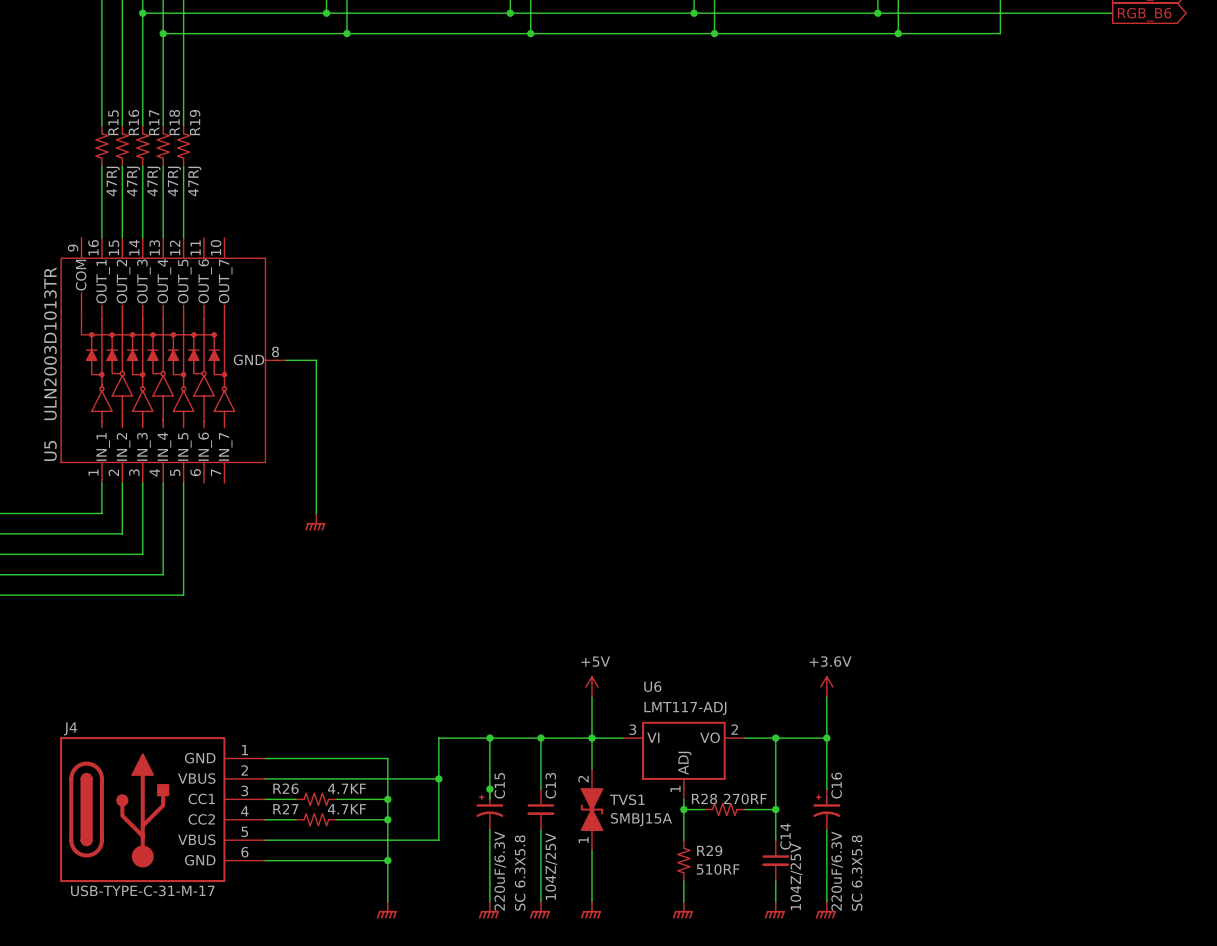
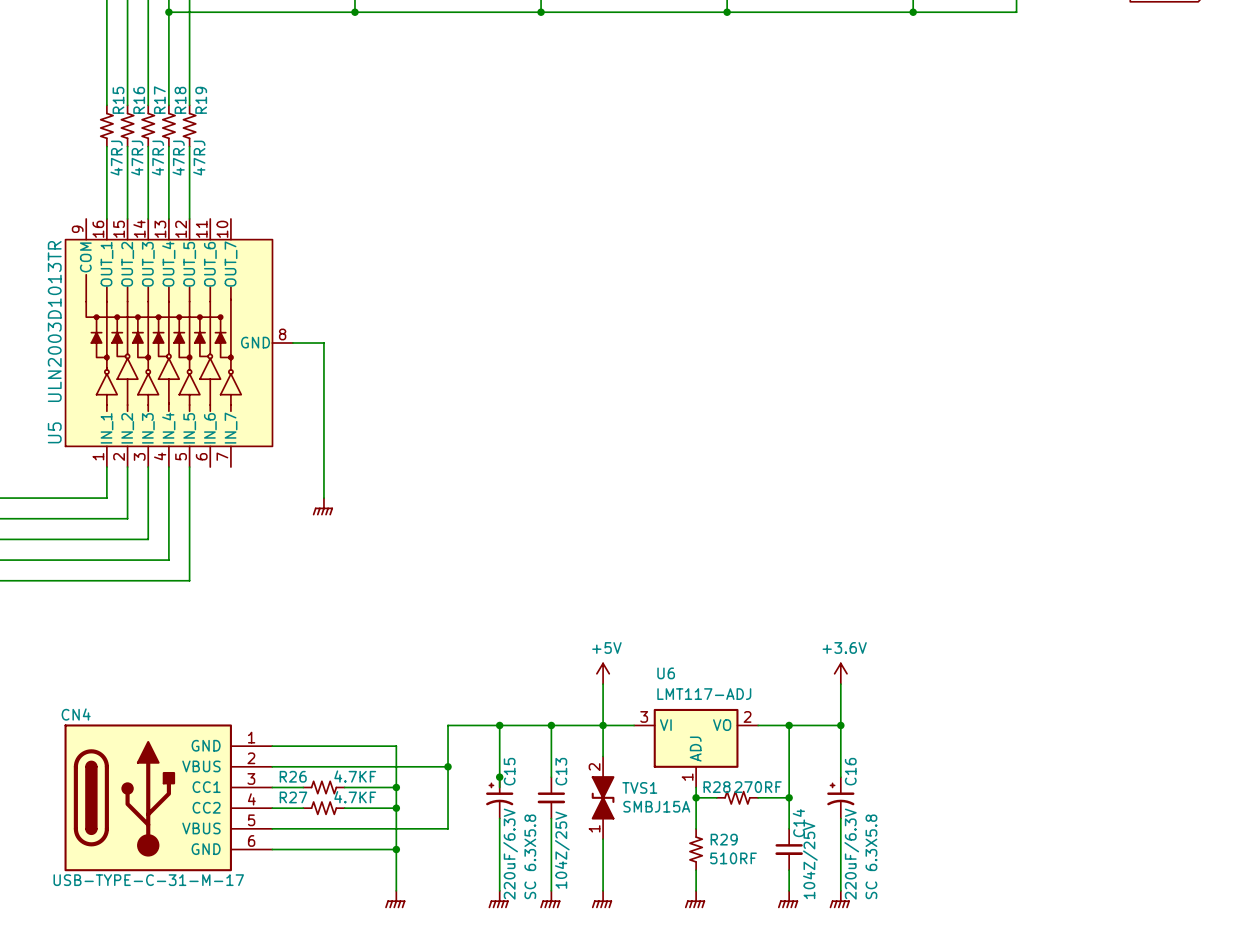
J4 name: J4 (70, 728) -> CN4 (76, 714)

